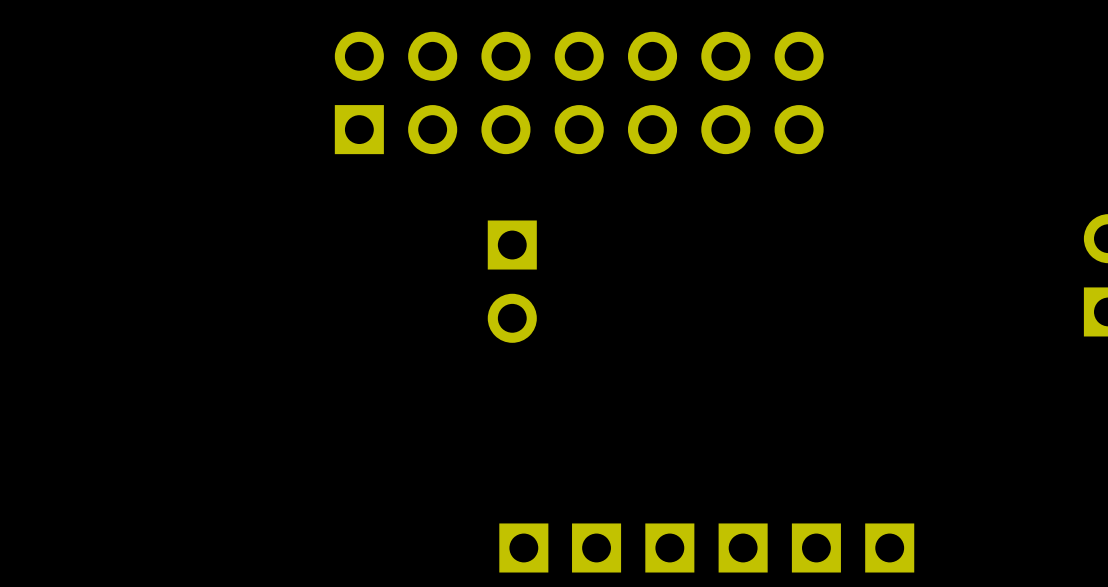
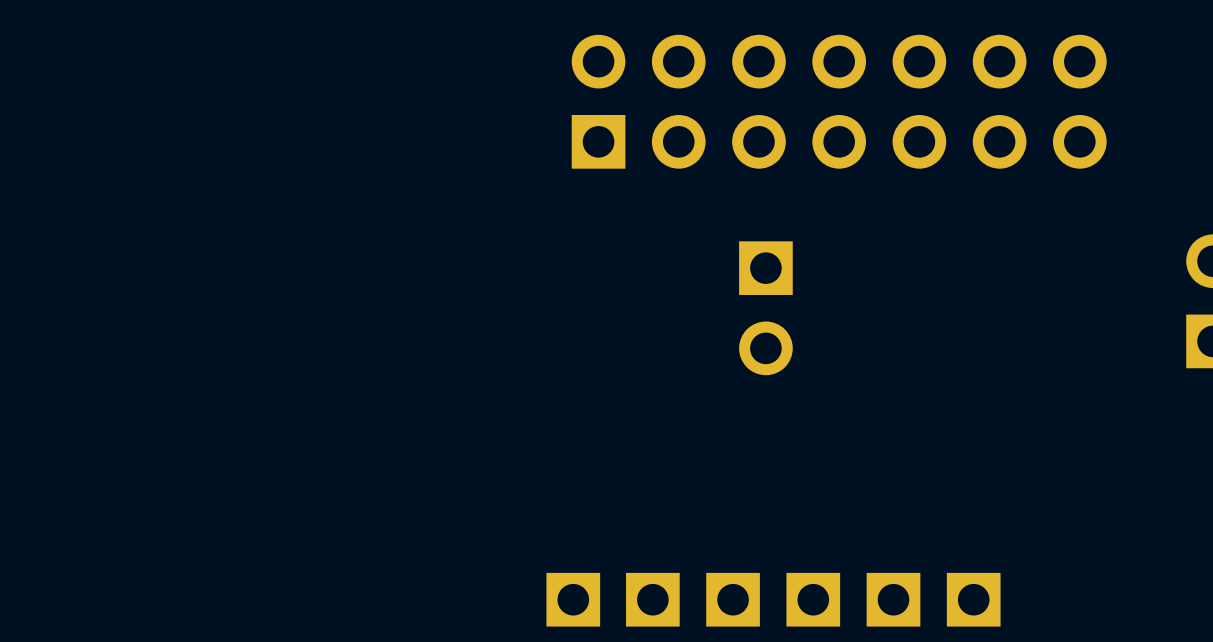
part position: (579, 92) -> (839, 101)
part position: (512, 281) -> (765, 308)

